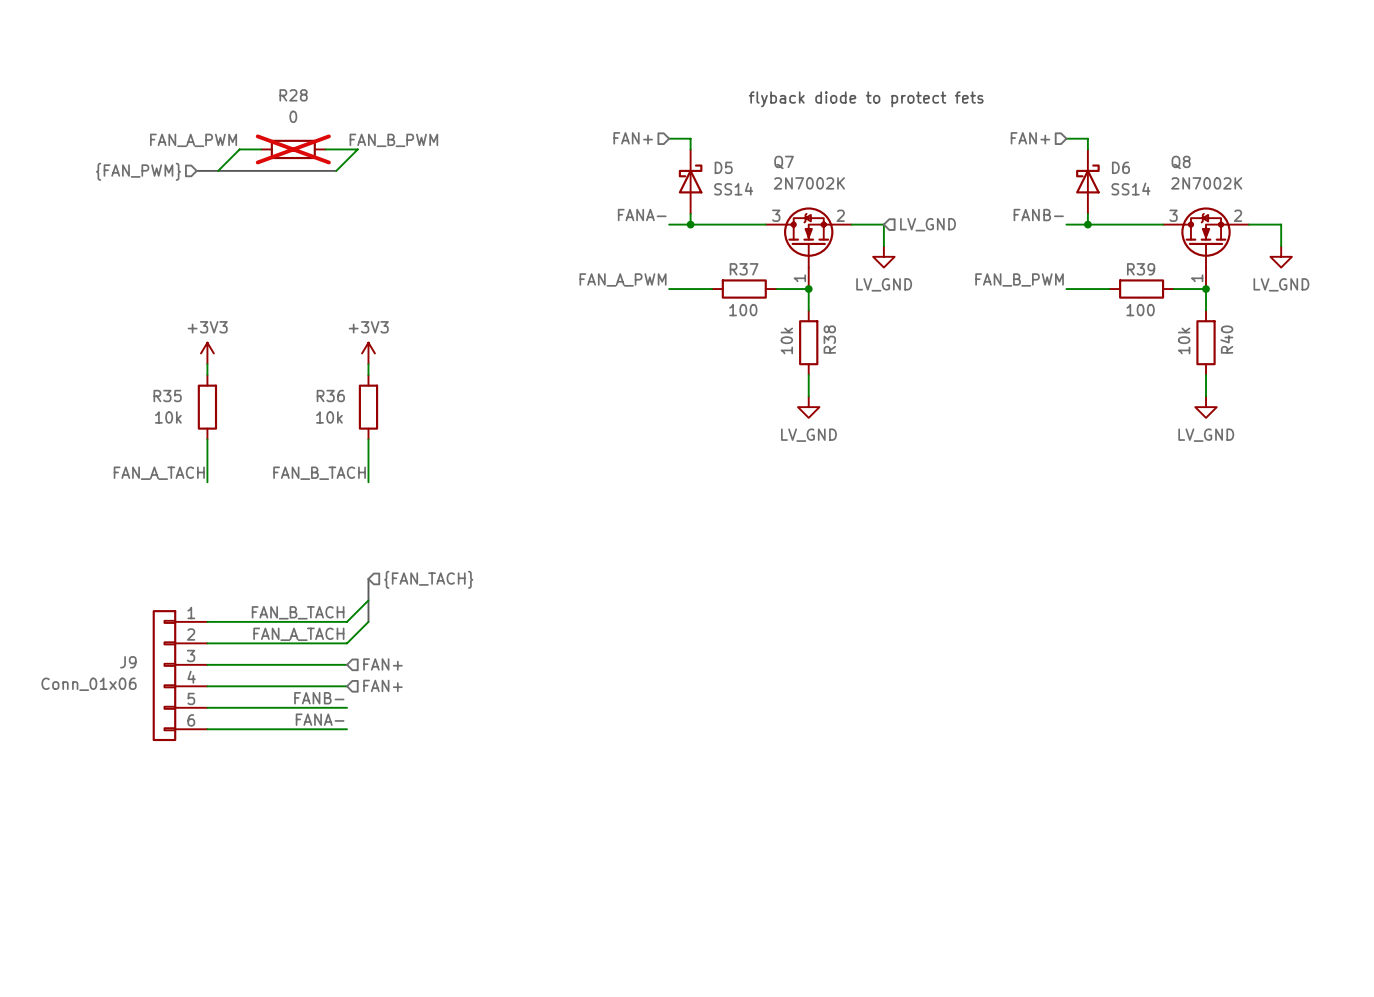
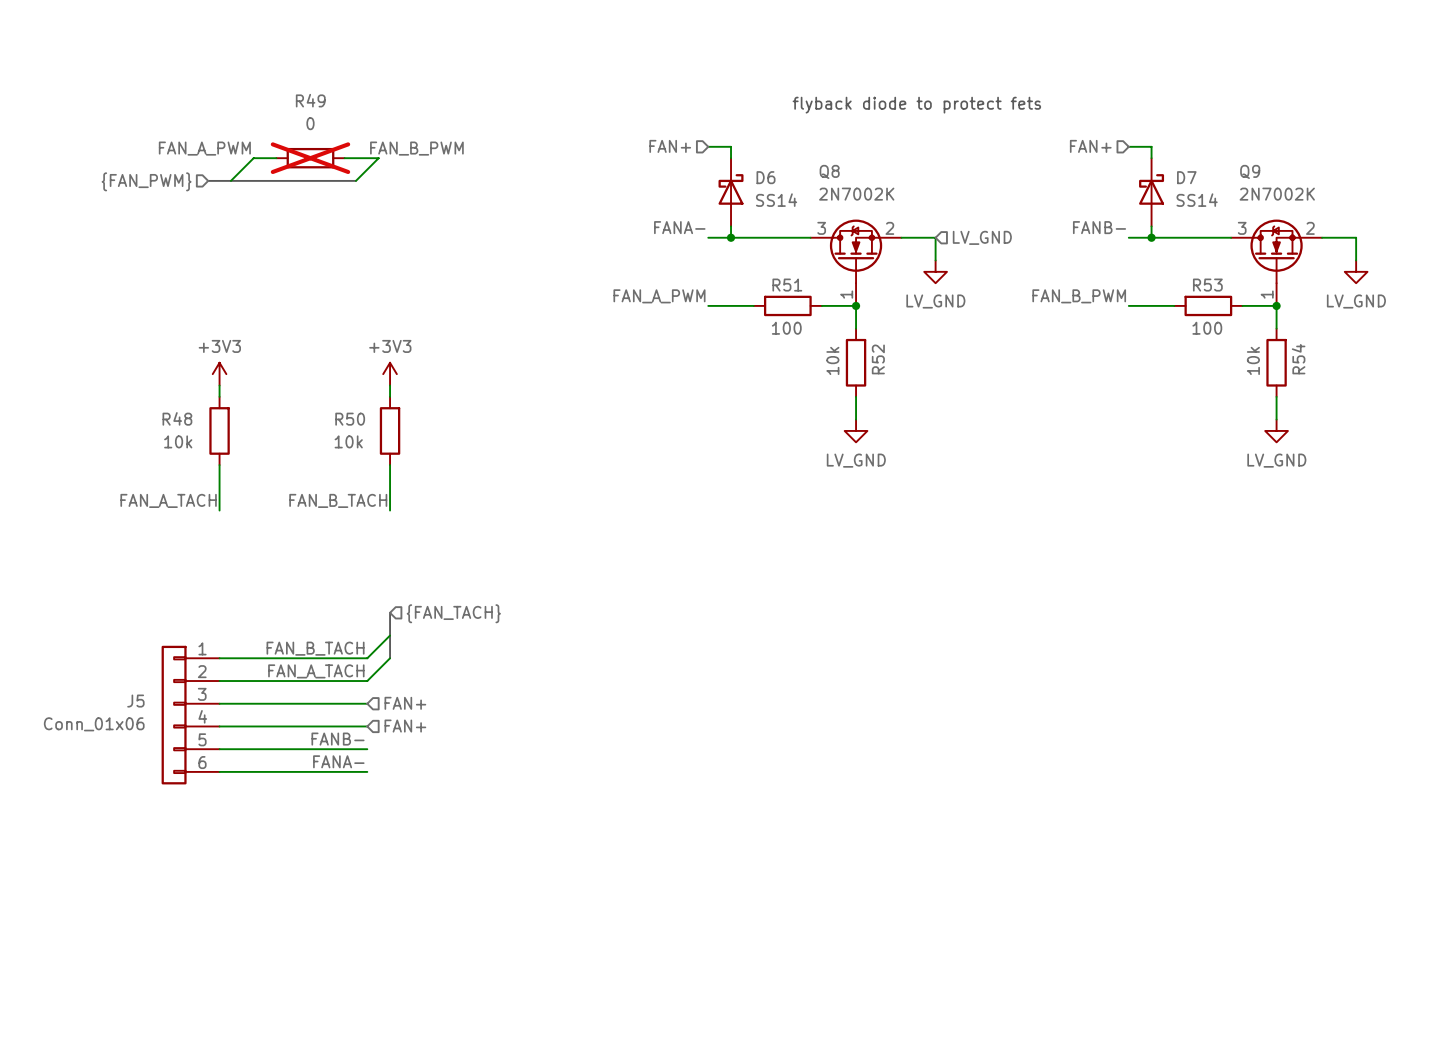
R28 name: R28 (293, 95) -> R49 (310, 100)
Q7 name: Q7 (784, 162) -> Q8 (829, 171)
Q8 name: Q8 (1181, 162) -> Q9 (1250, 171)
D5 name: D5 (723, 167) -> D6 (766, 177)
D6 name: D6 (1120, 167) -> D7 (1186, 177)
R37 name: R37 (744, 269) -> R51 (787, 285)
R39 name: R39 (1141, 269) -> R53 (1207, 285)
R38 name: R38 (829, 339) -> R52 (878, 359)
R40 name: R40 (1226, 339) -> R54 (1298, 359)
R35 name: R35 (167, 396) -> R48 (177, 418)
R36 name: R36 (330, 396) -> R50 (350, 419)
J9 name: J9 (128, 662) -> J5 (135, 701)

